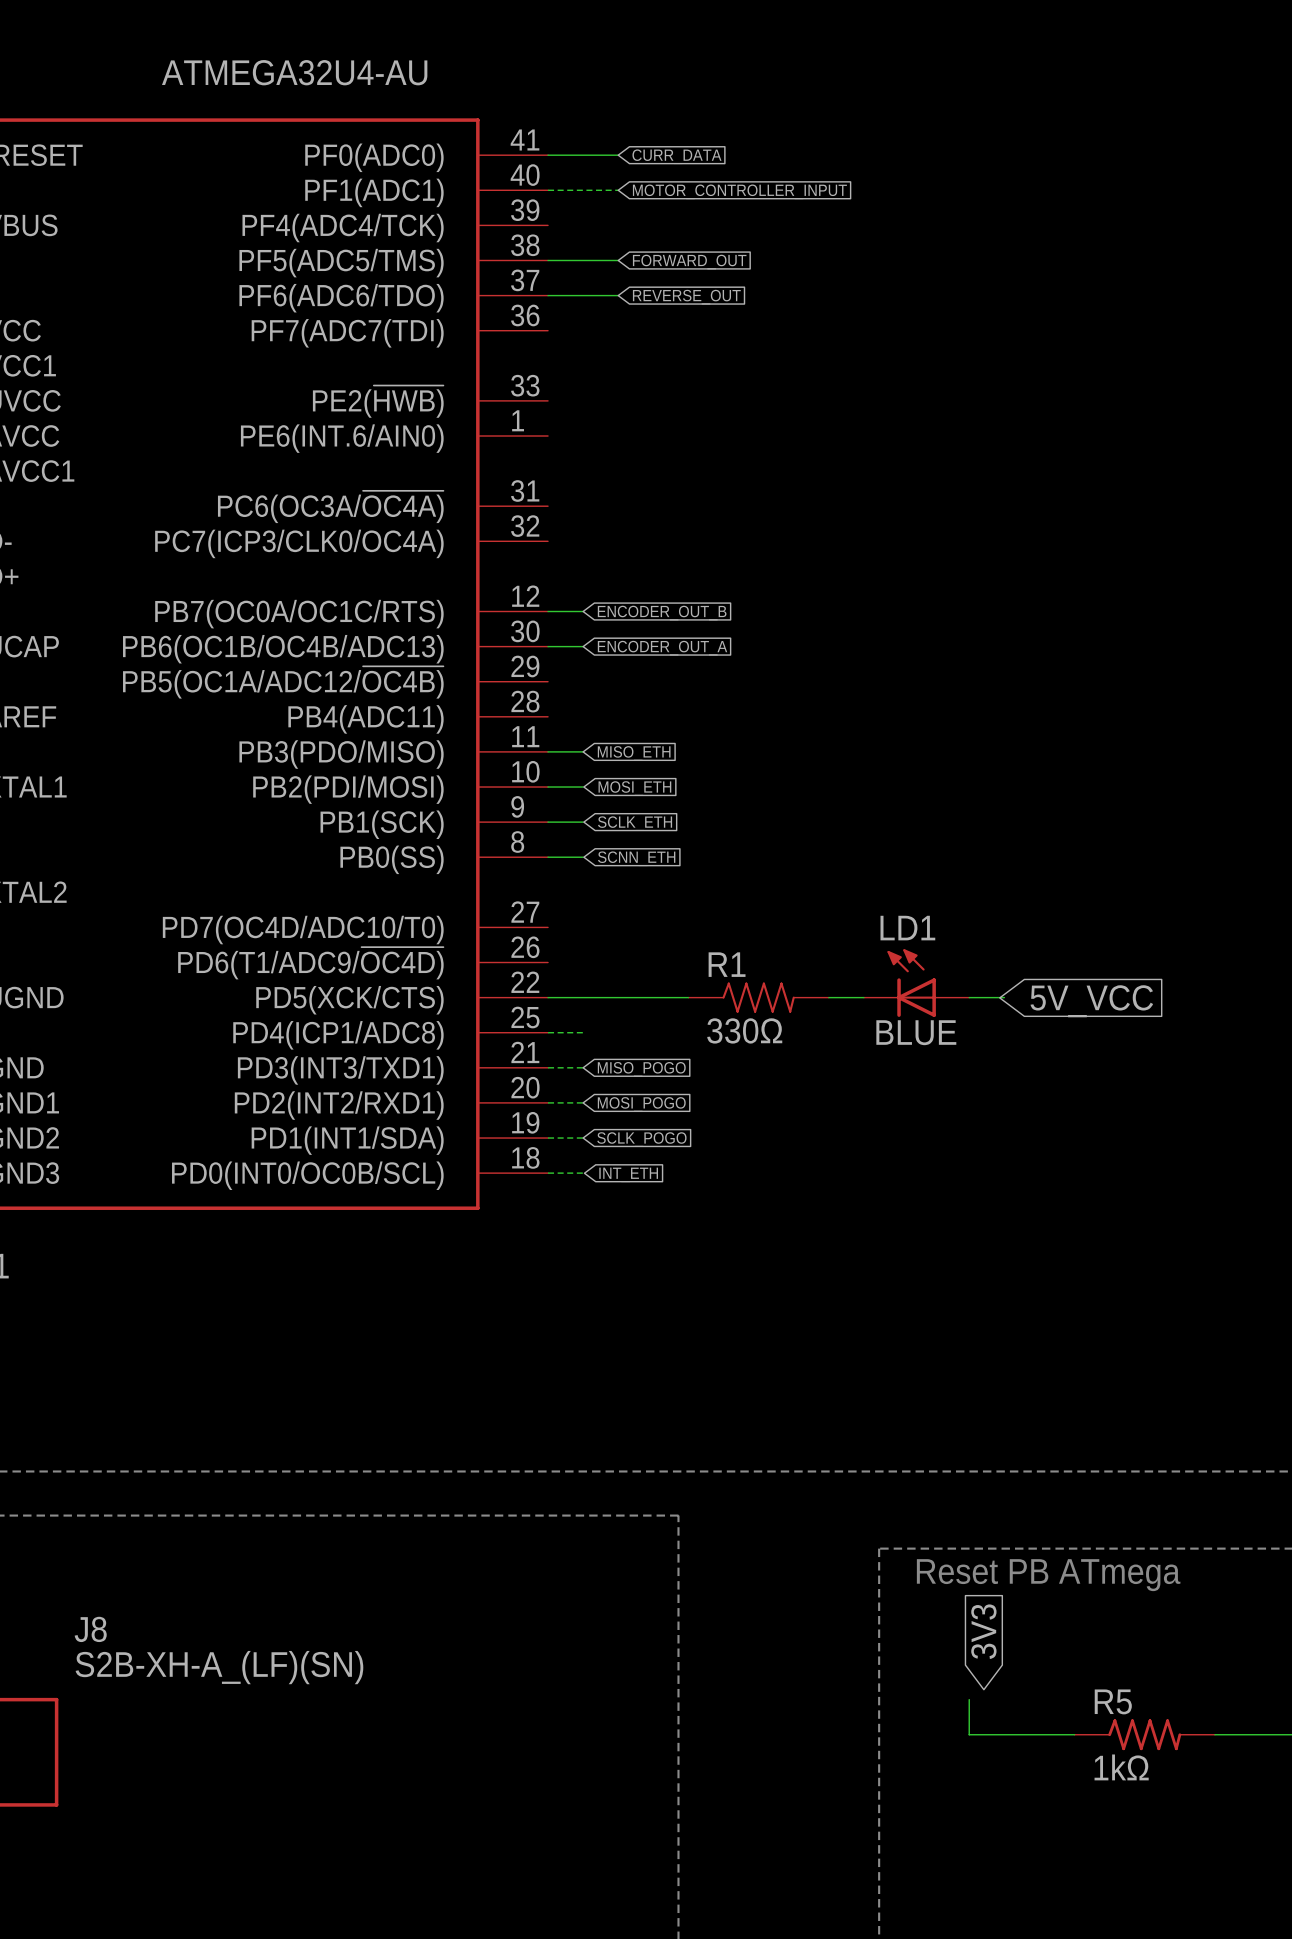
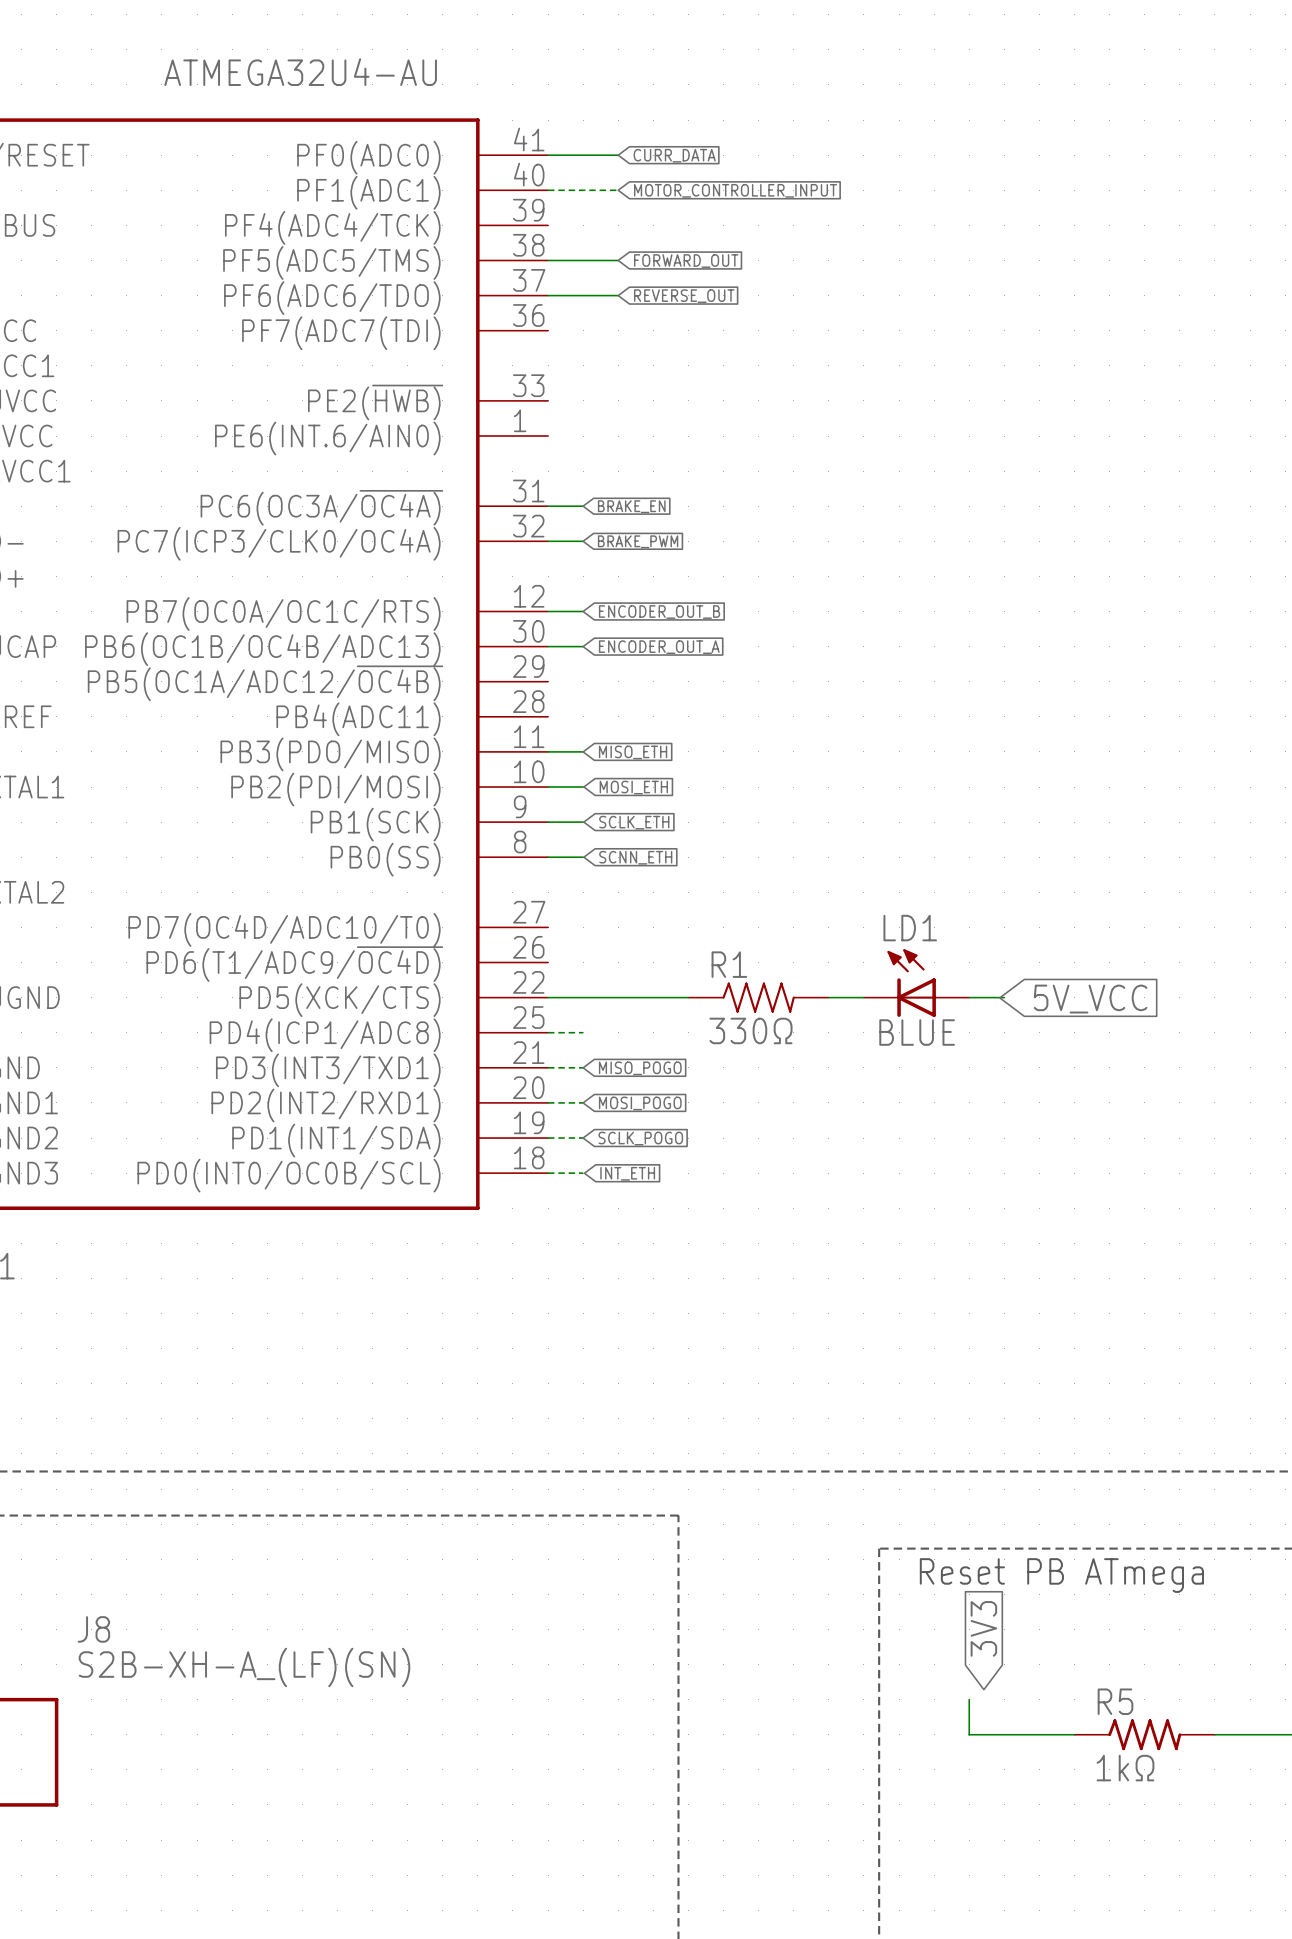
wire: none -> (548, 506) (583, 506)
global label: none -> BRAKE_EN (631, 506)
wire: none -> (548, 541) (583, 541)
global label: none -> BRAKE_PWM (638, 541)

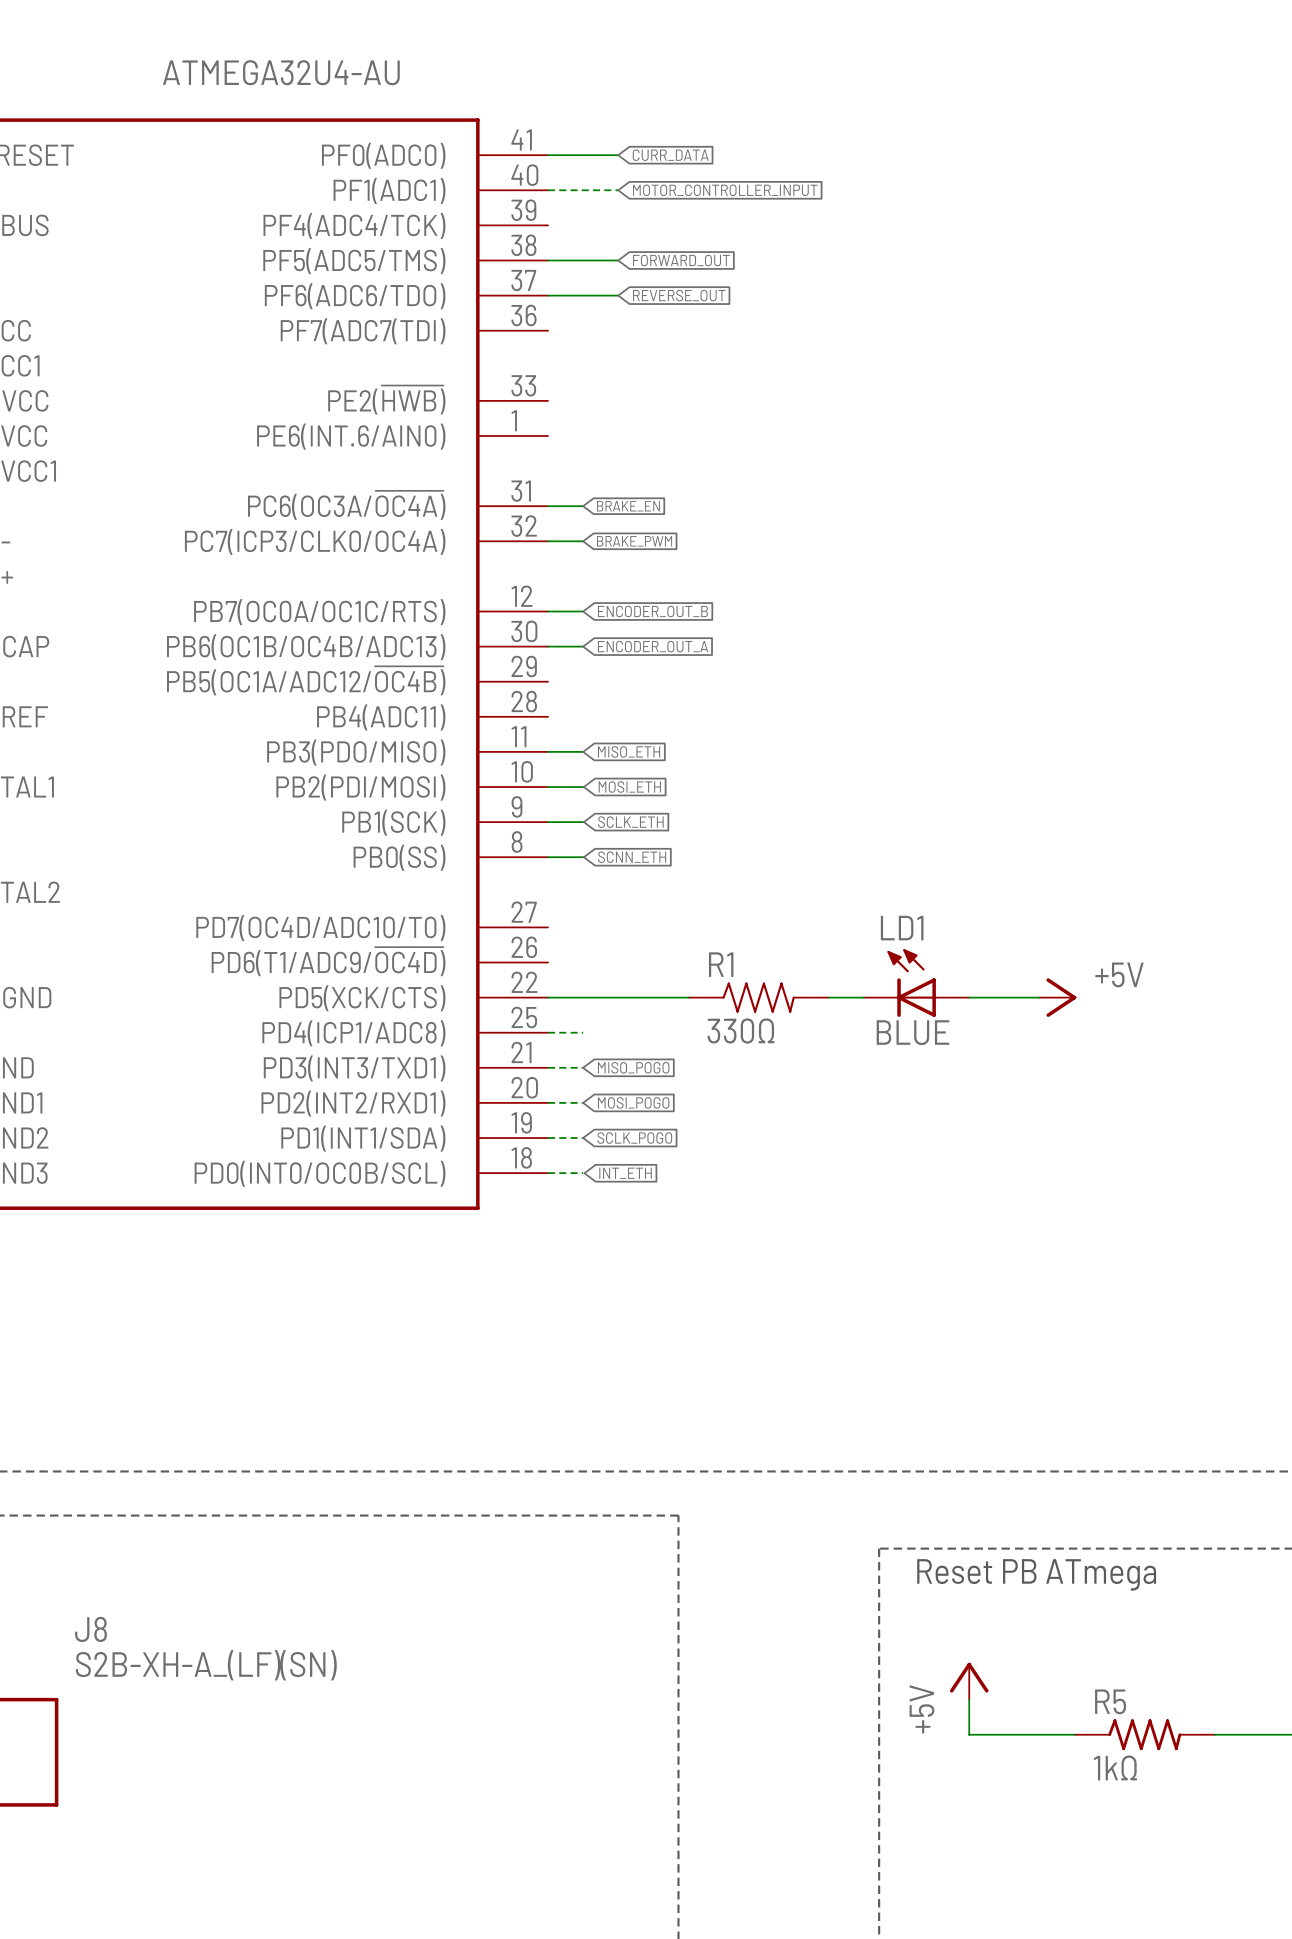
wire: none -> (1004, 997) (1039, 997)
power symbol: none -> +5V (1057, 997)
global label: 5V_VCC (1090, 999) -> none
global label: 3V3 (983, 1628) -> none
power symbol: none -> +5V (969, 1681)

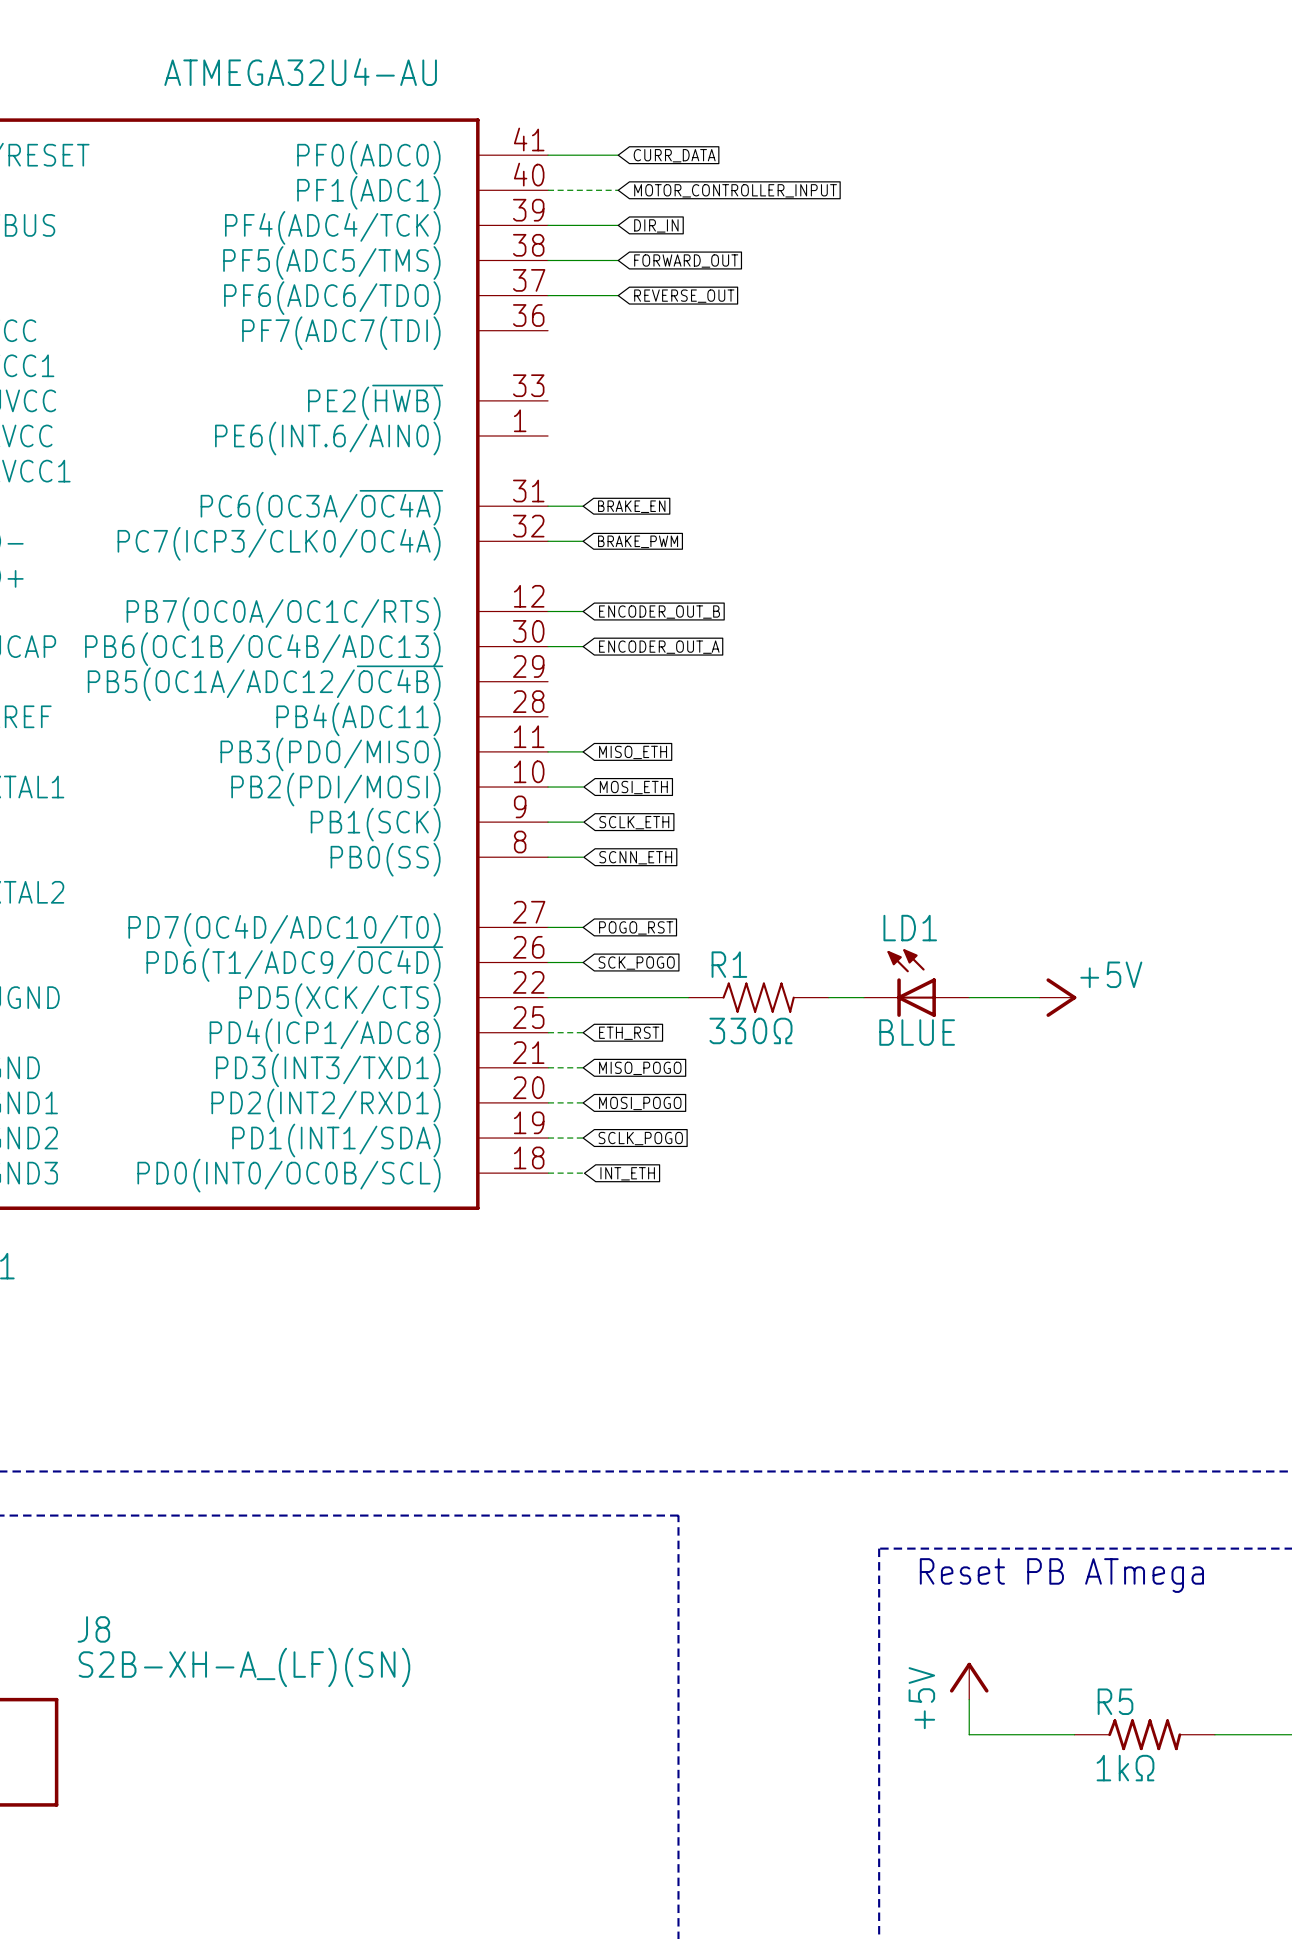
wire: none -> (548, 225) (618, 225)
global label: none -> DIR_IN (656, 225)
wire: none -> (548, 927) (583, 927)
global label: none -> POGO_RST (636, 927)
wire: none -> (548, 962) (583, 962)
global label: none -> SCK_POGO (636, 963)
global label: none -> ETH_RST (629, 1033)

